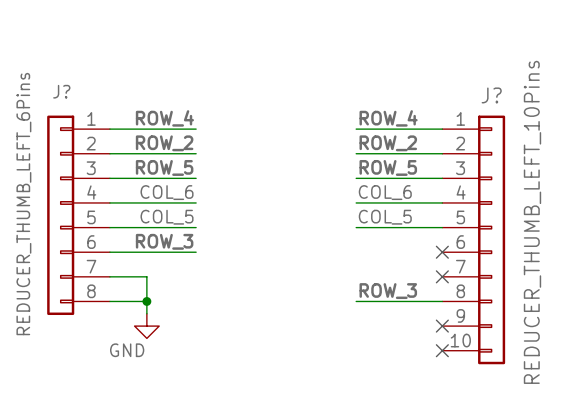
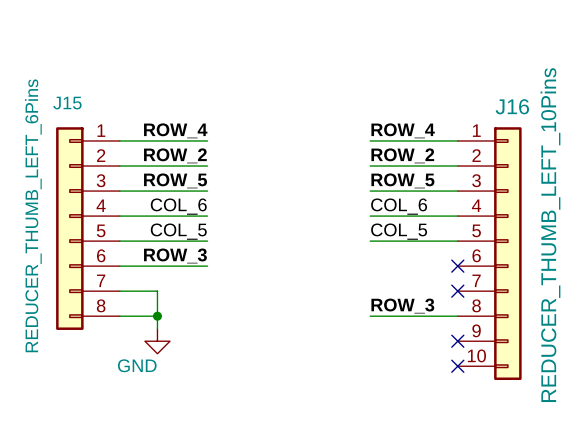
J? name: J? (61, 91) -> J15 (67, 103)
J? name: J? (491, 95) -> J16 (512, 106)

